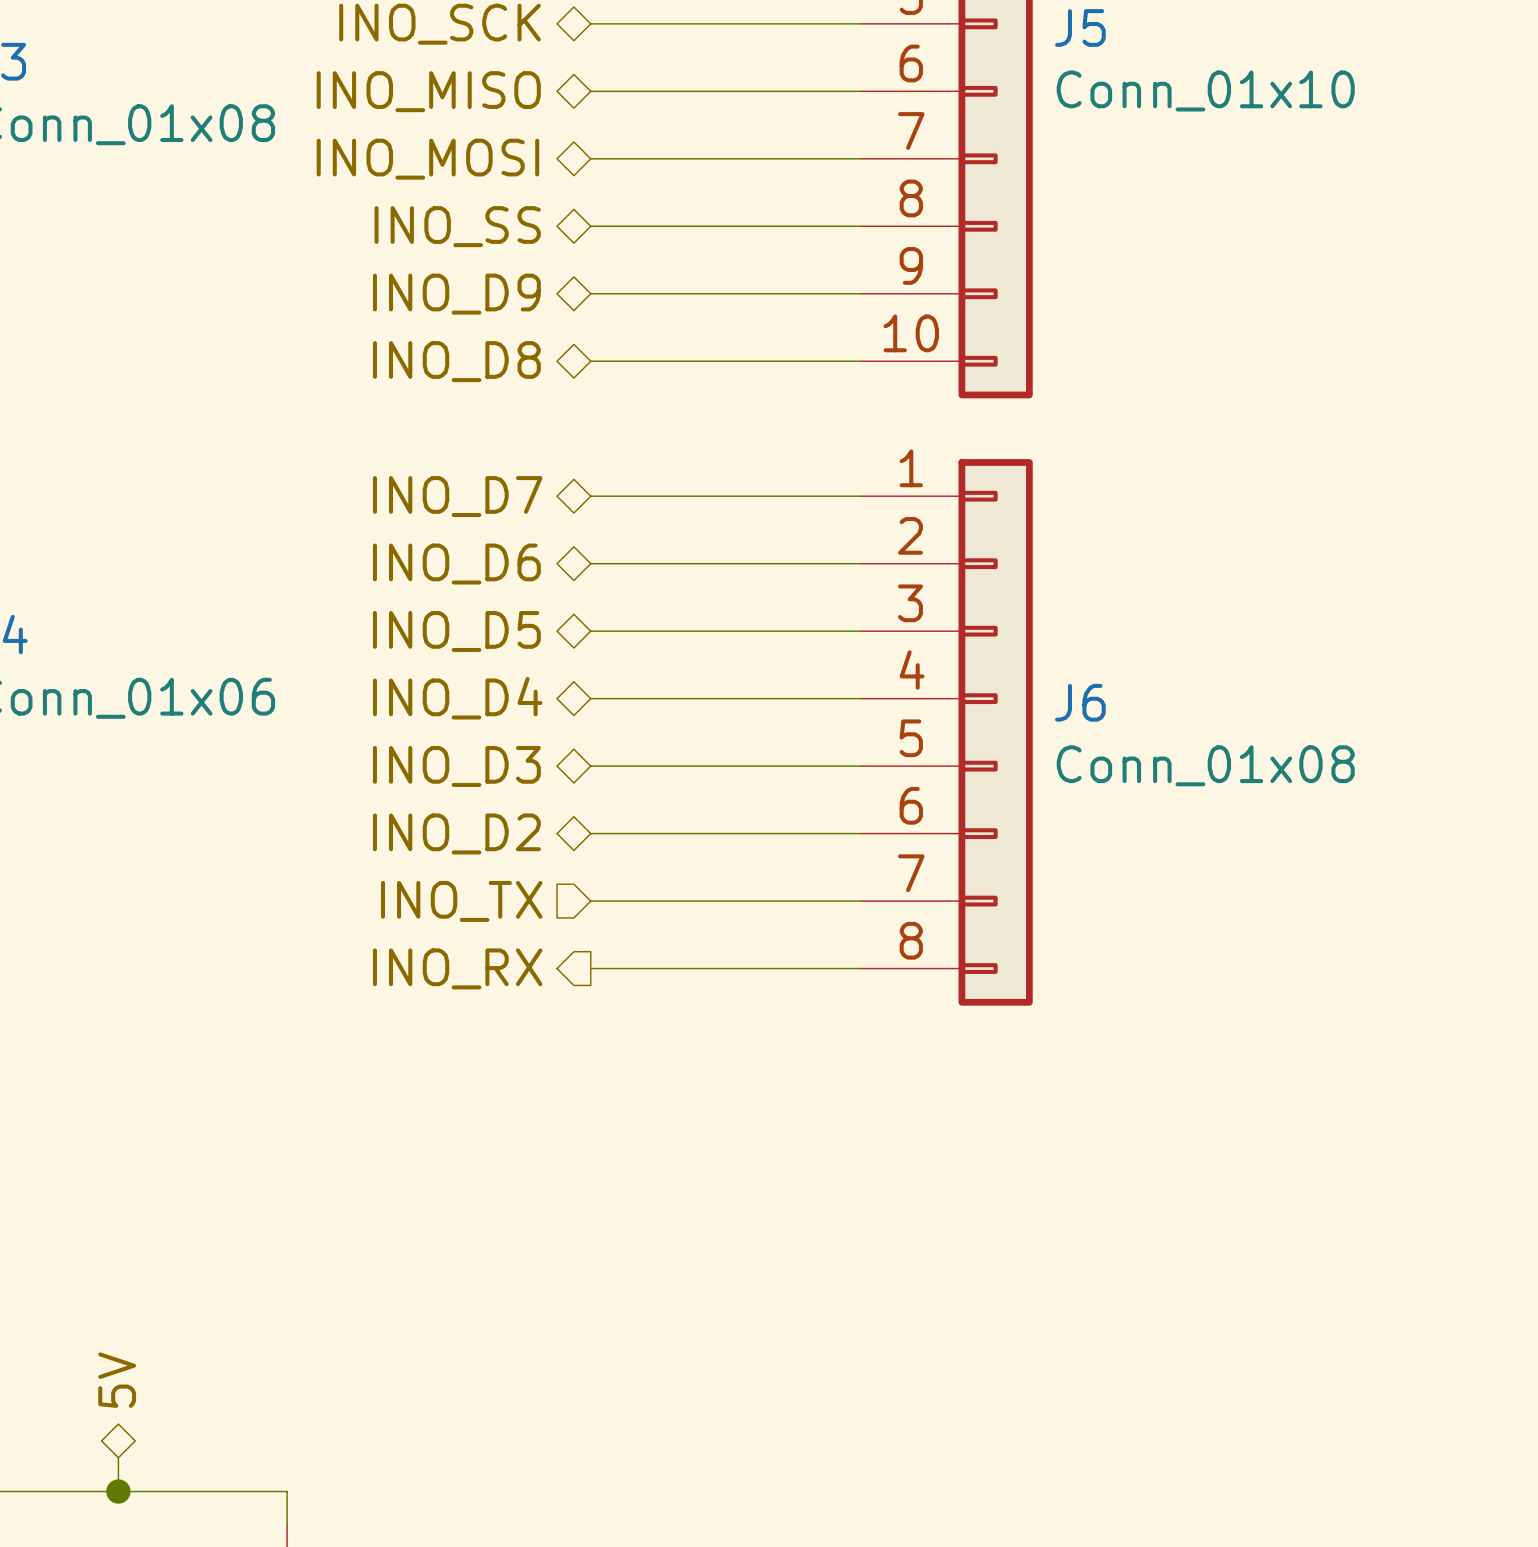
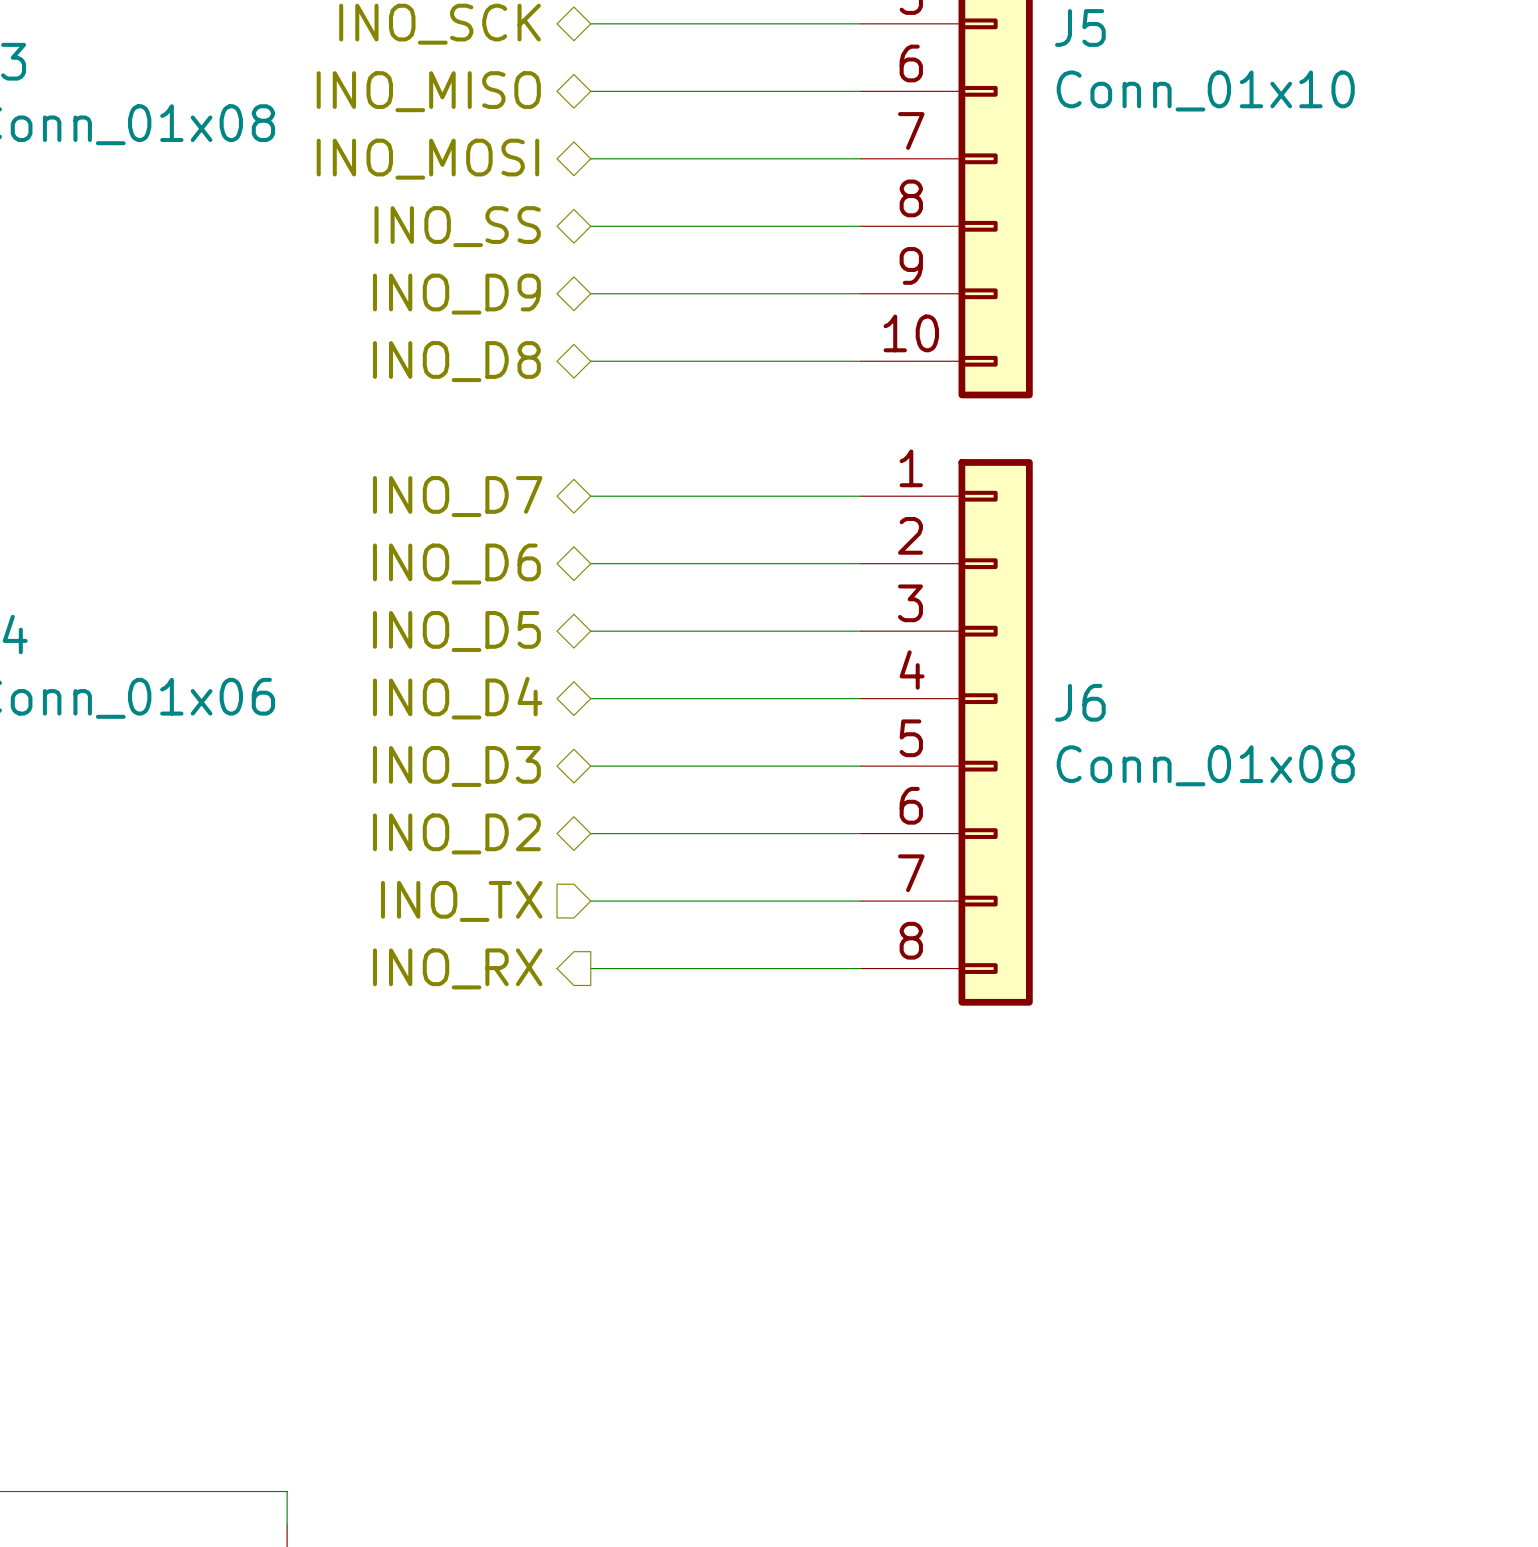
hierarchical label: 5V (117, 1380) -> none
wire: (118, 1457) (118, 1491) -> none
junction: (118, 1491) -> none

